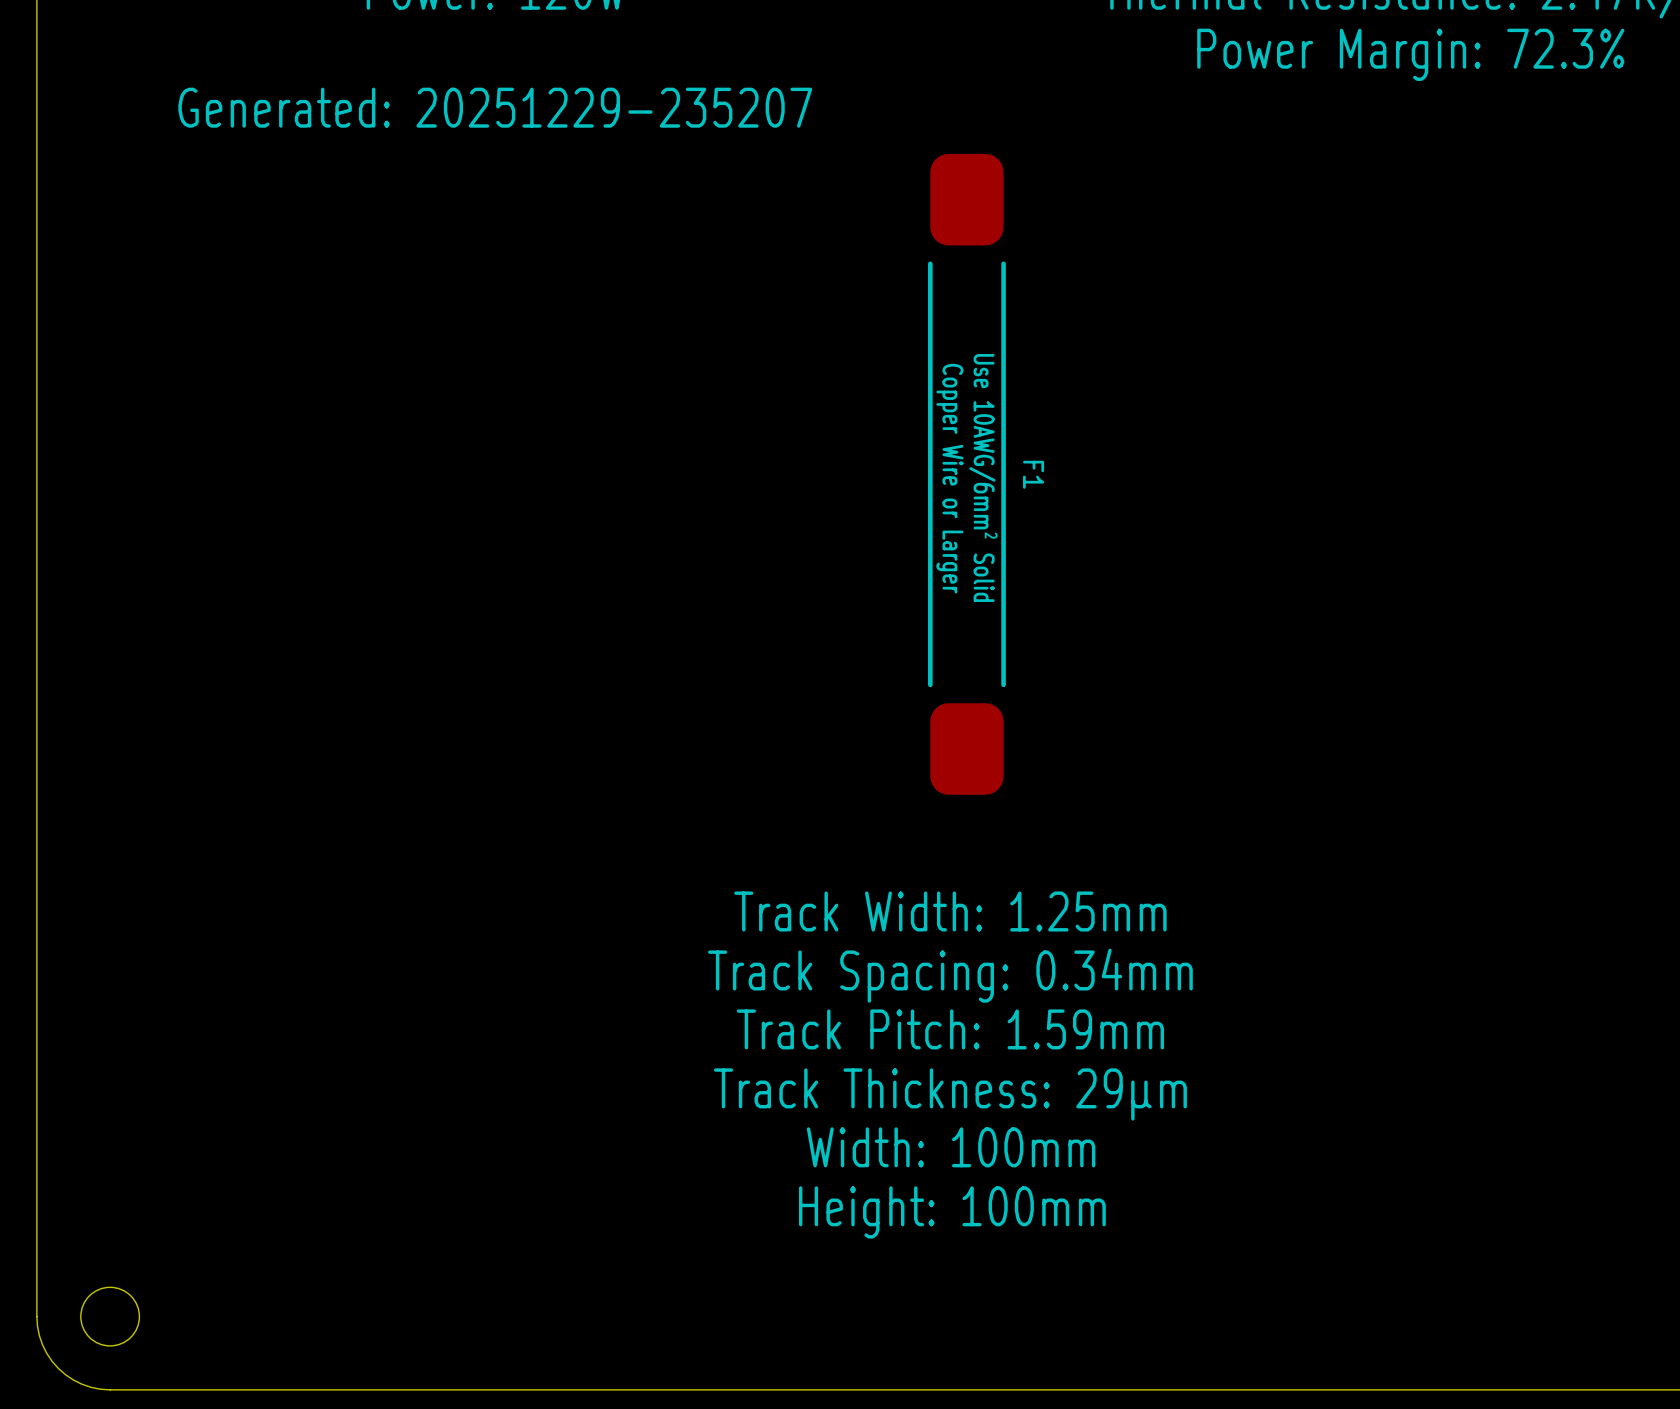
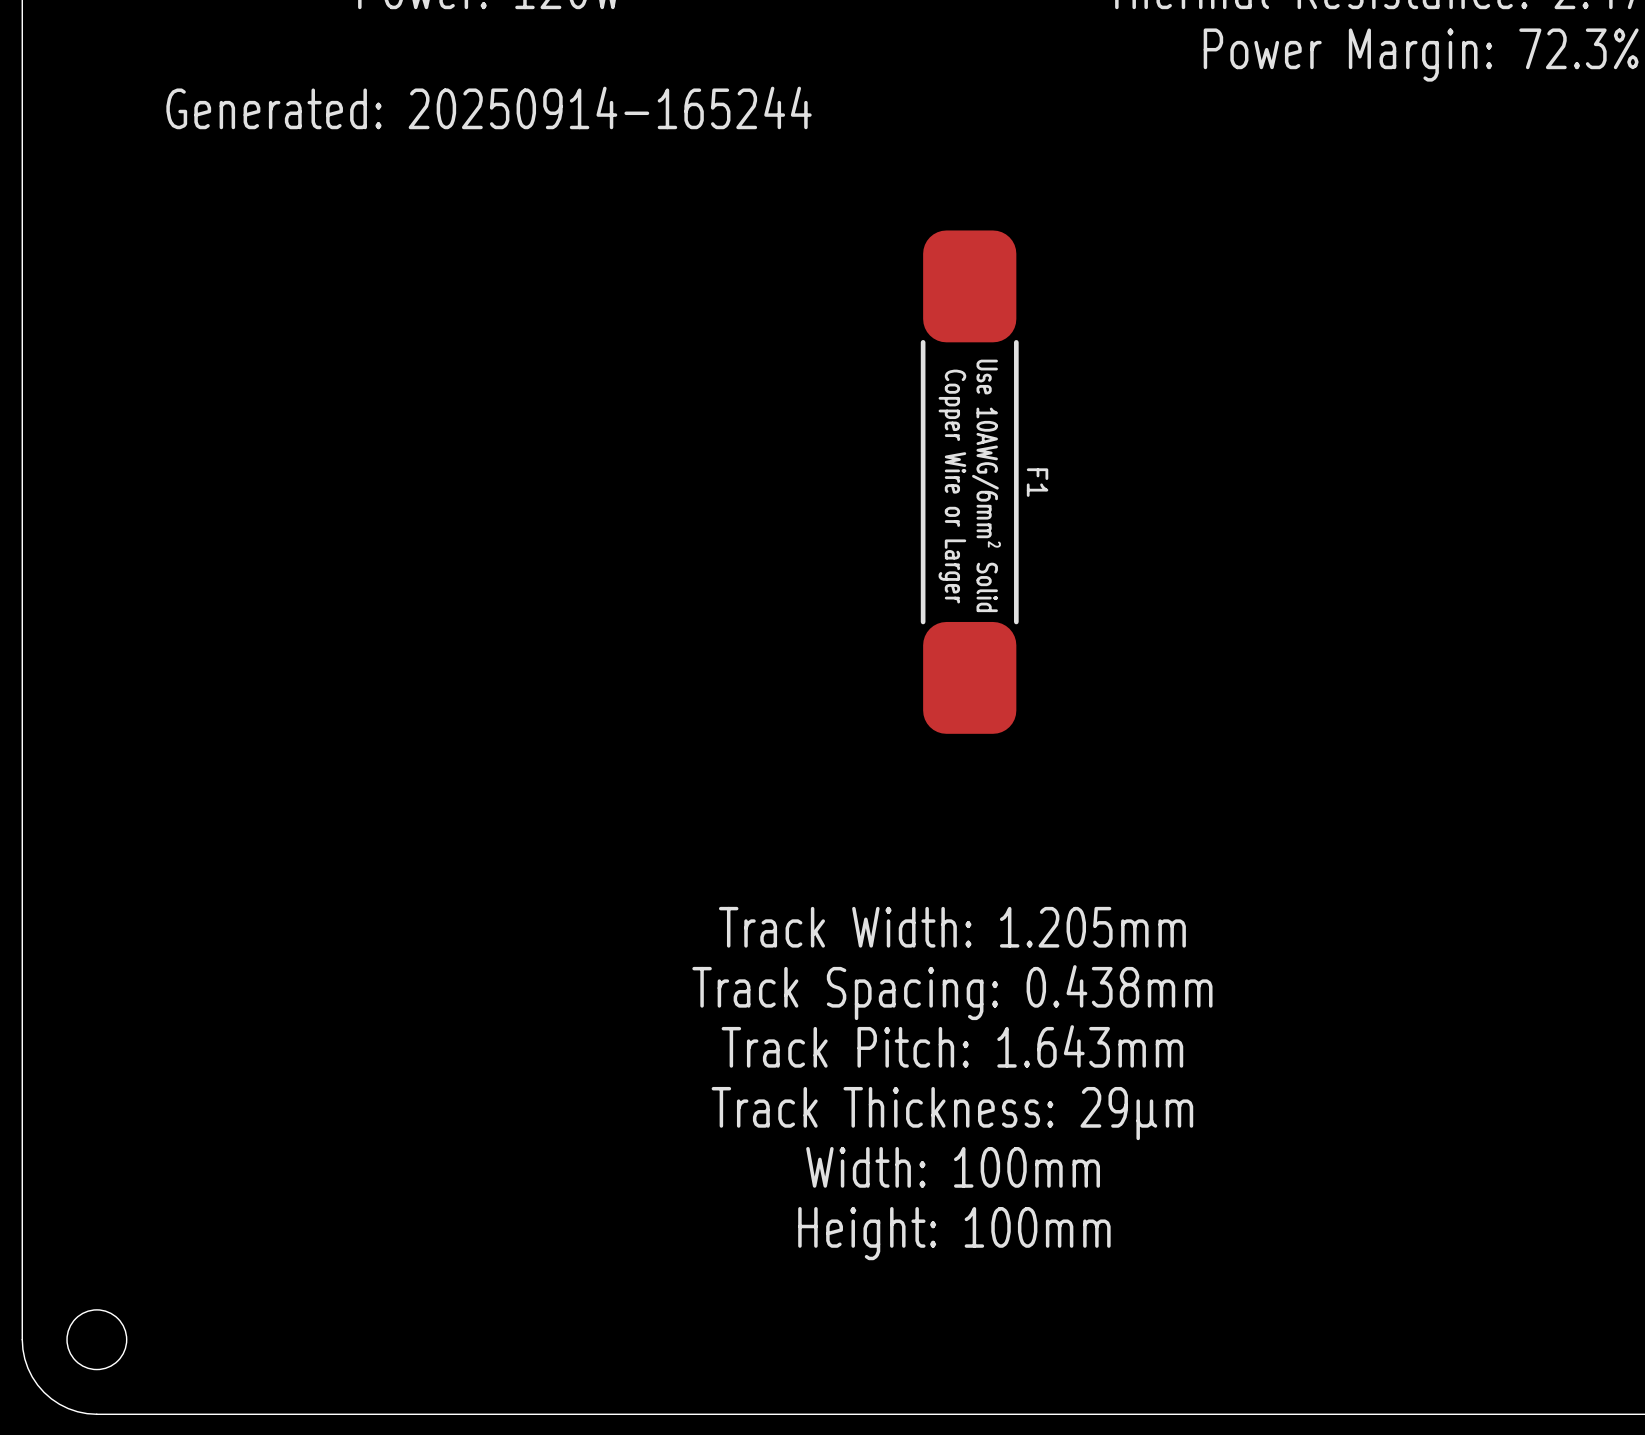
text: Generated: 20251229-235207 (495, 107) -> Generated: 20250914-165244 (489, 107)
F1 footprint: [928, 153, 1006, 795] -> [920, 230, 1019, 734]
text: Track Width: 1.25mm (950, 911) -> Track Width: 1.205mm (952, 927)
text: Track Spacing: 0.34mm (950, 975) -> Track Spacing: 0.438mm (952, 992)
text: Track Pitch: 1.59mm (950, 1029) -> Track Pitch: 1.643mm (952, 1046)

